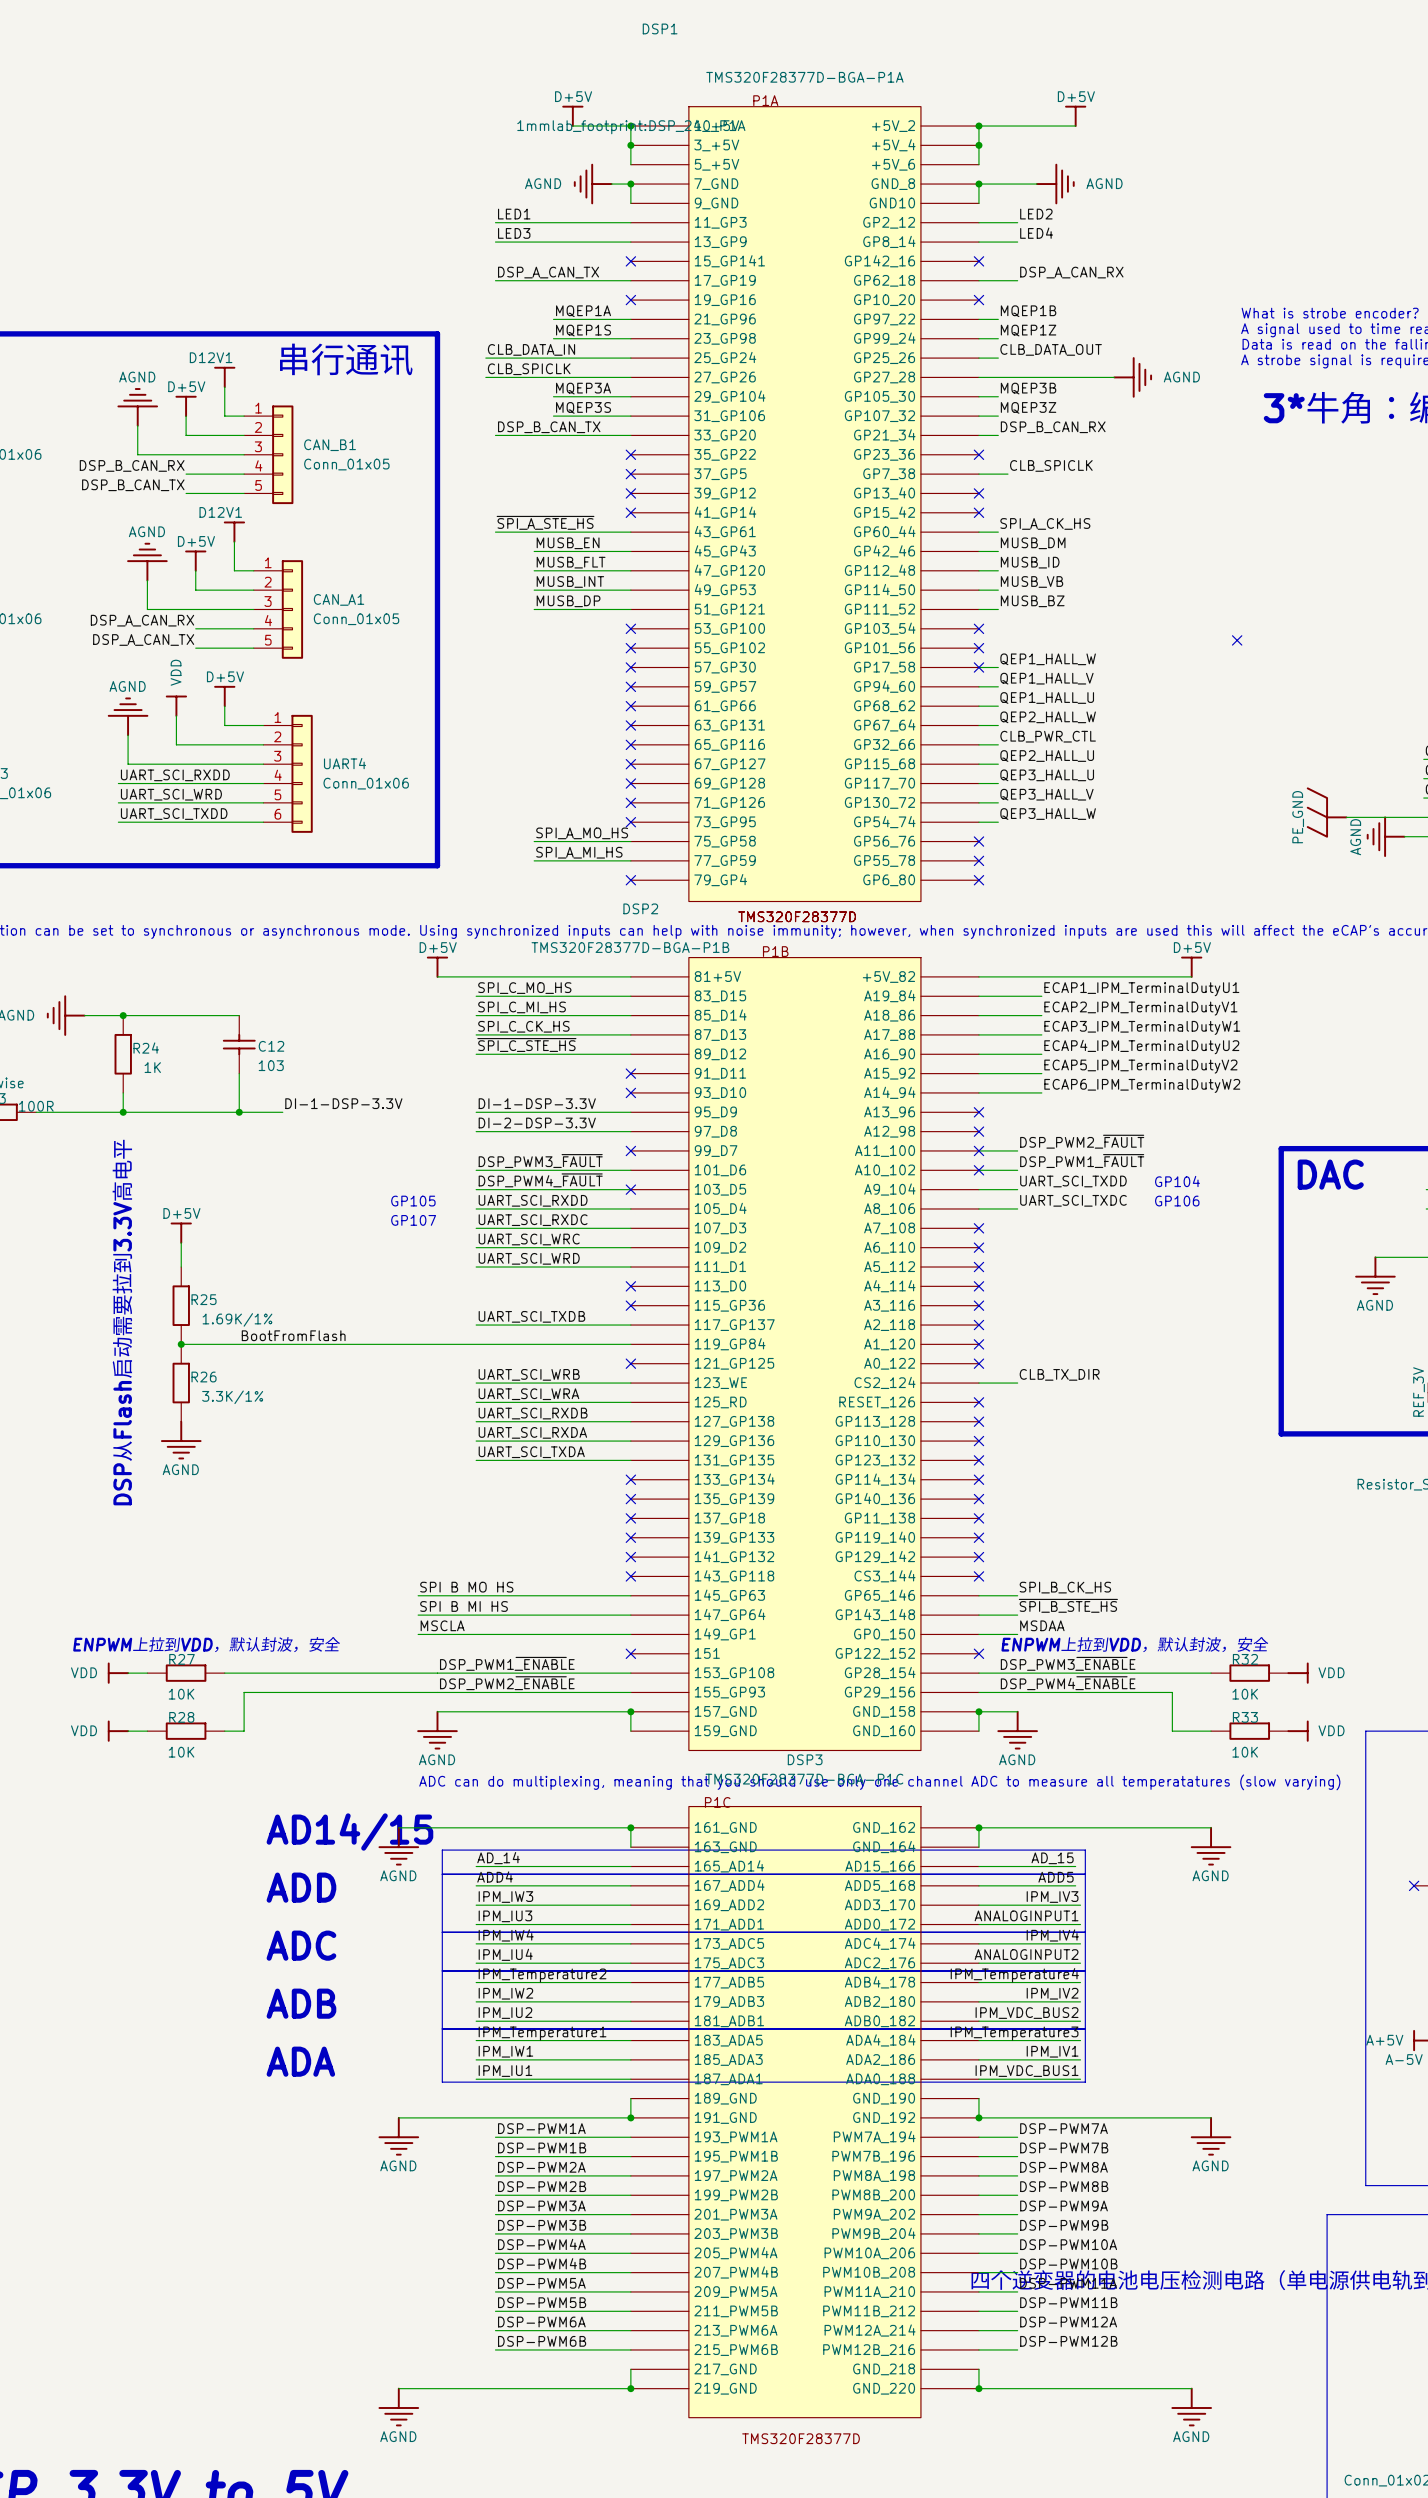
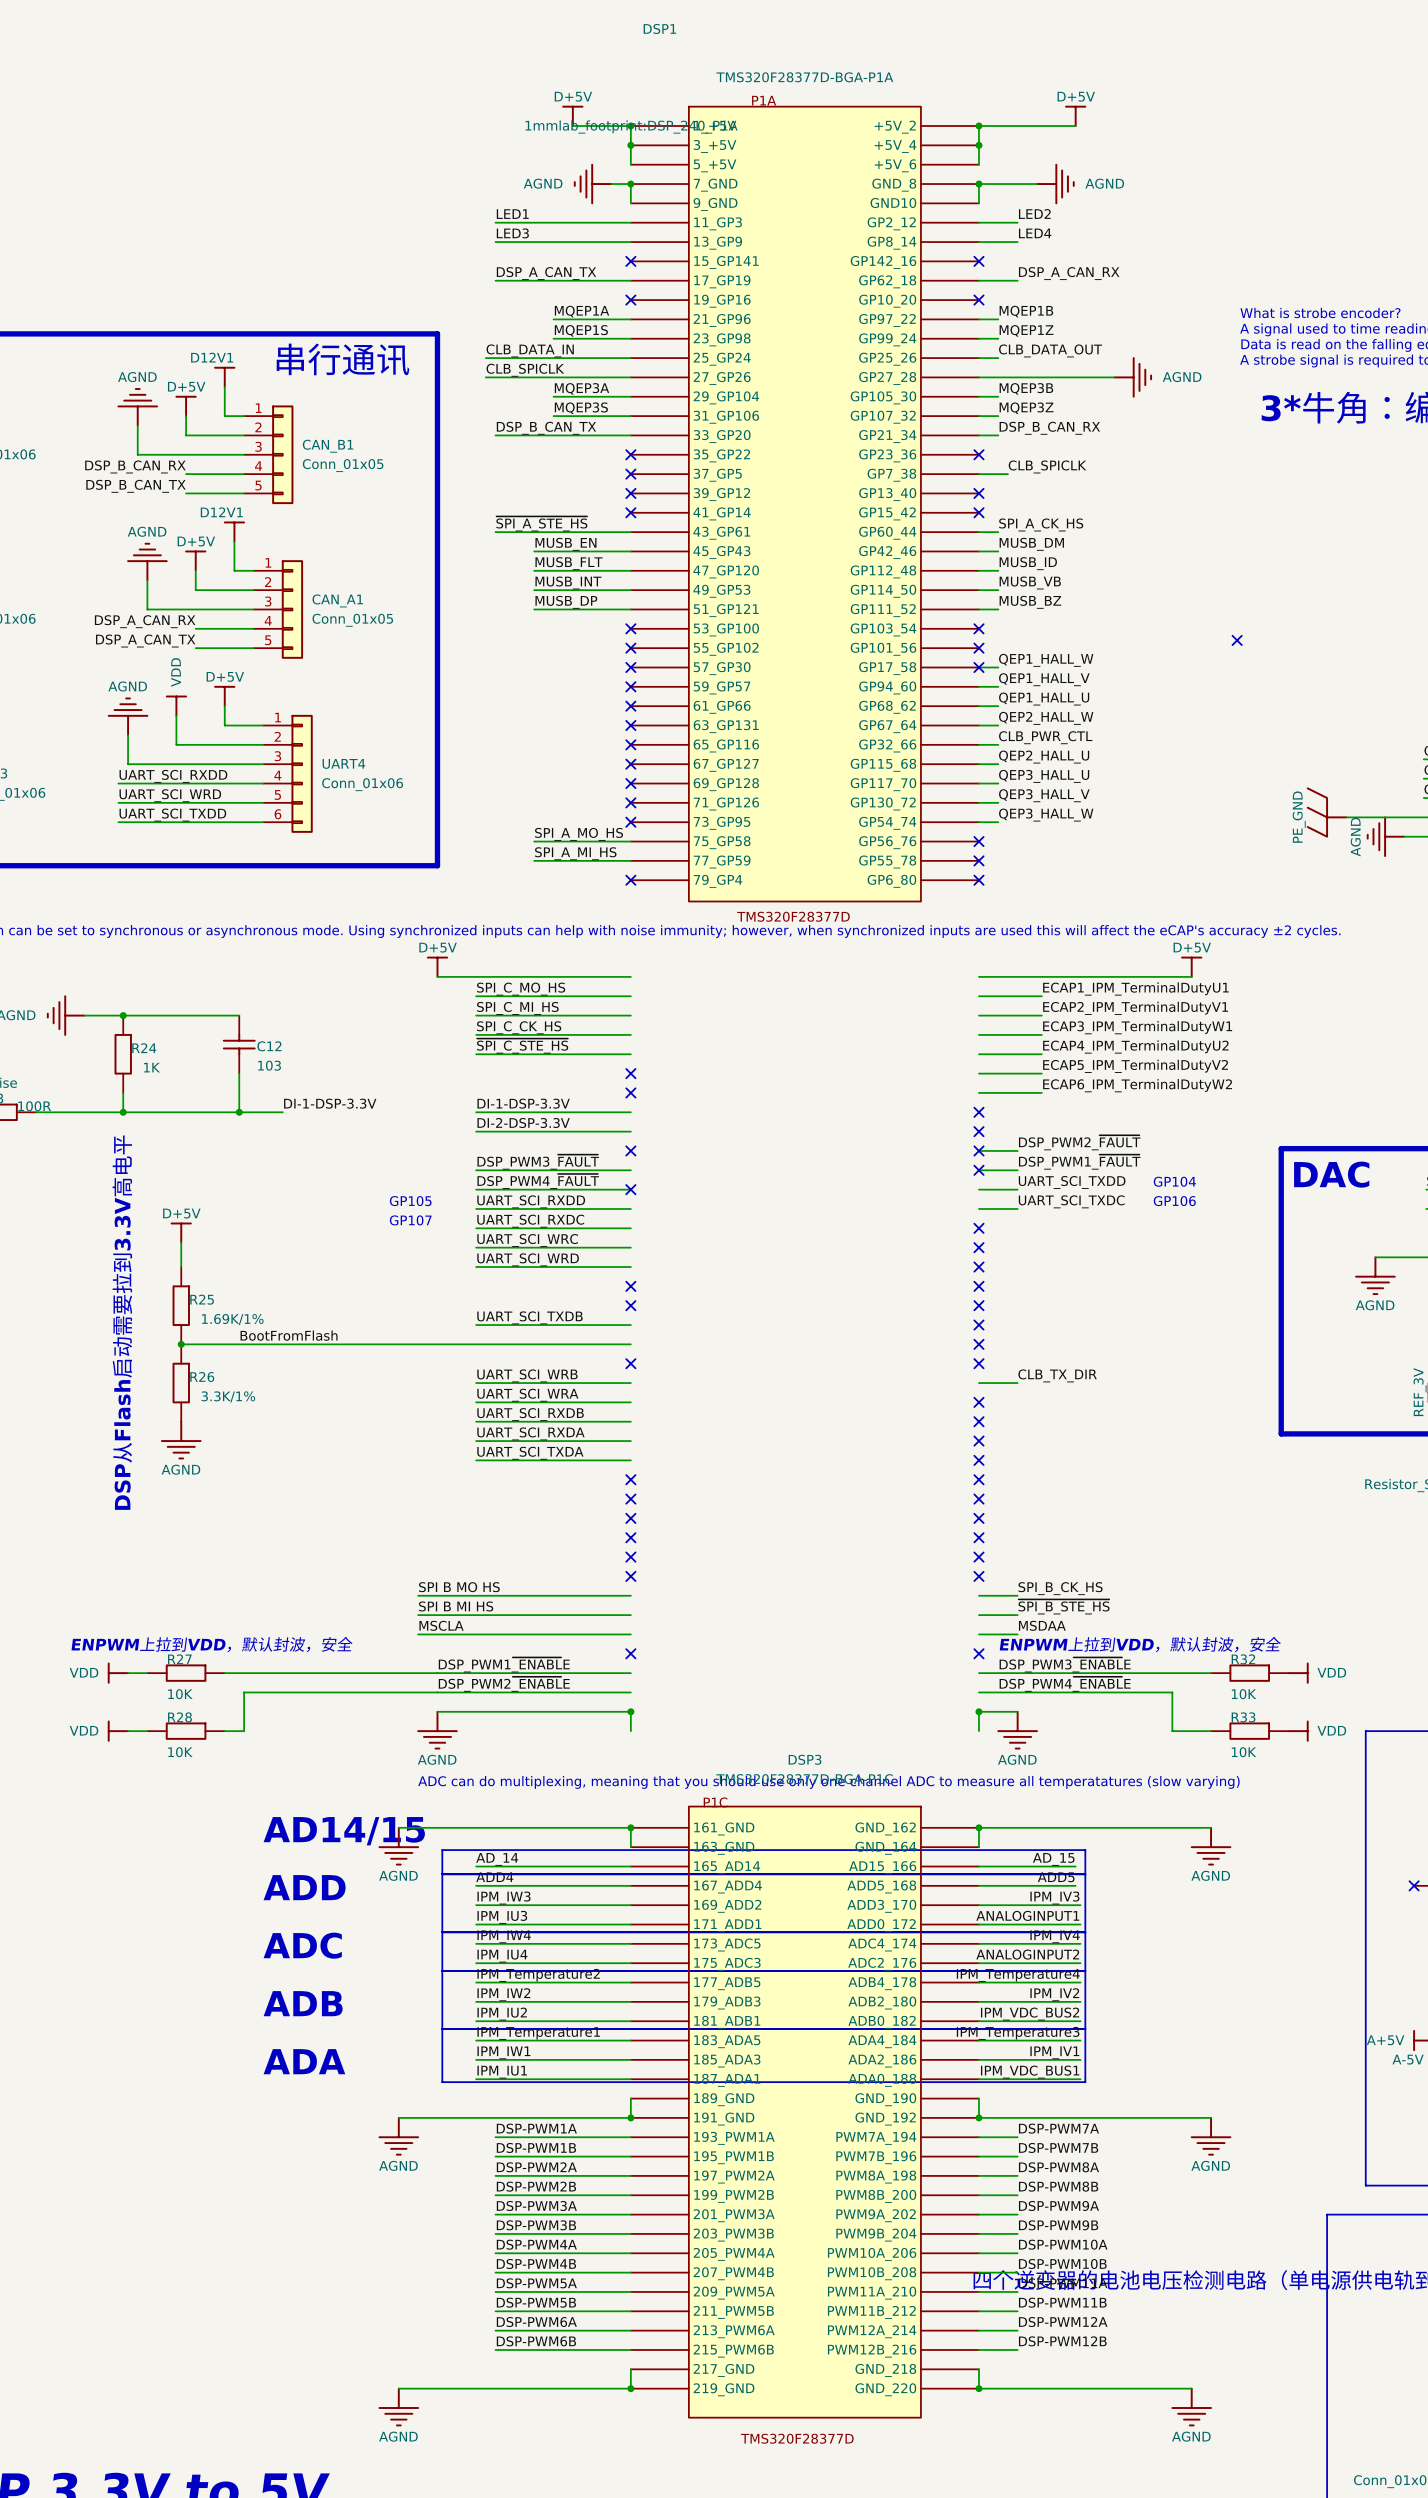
DSP2: TMS320F28377D-BGA-P1B (804, 1354) -> none

